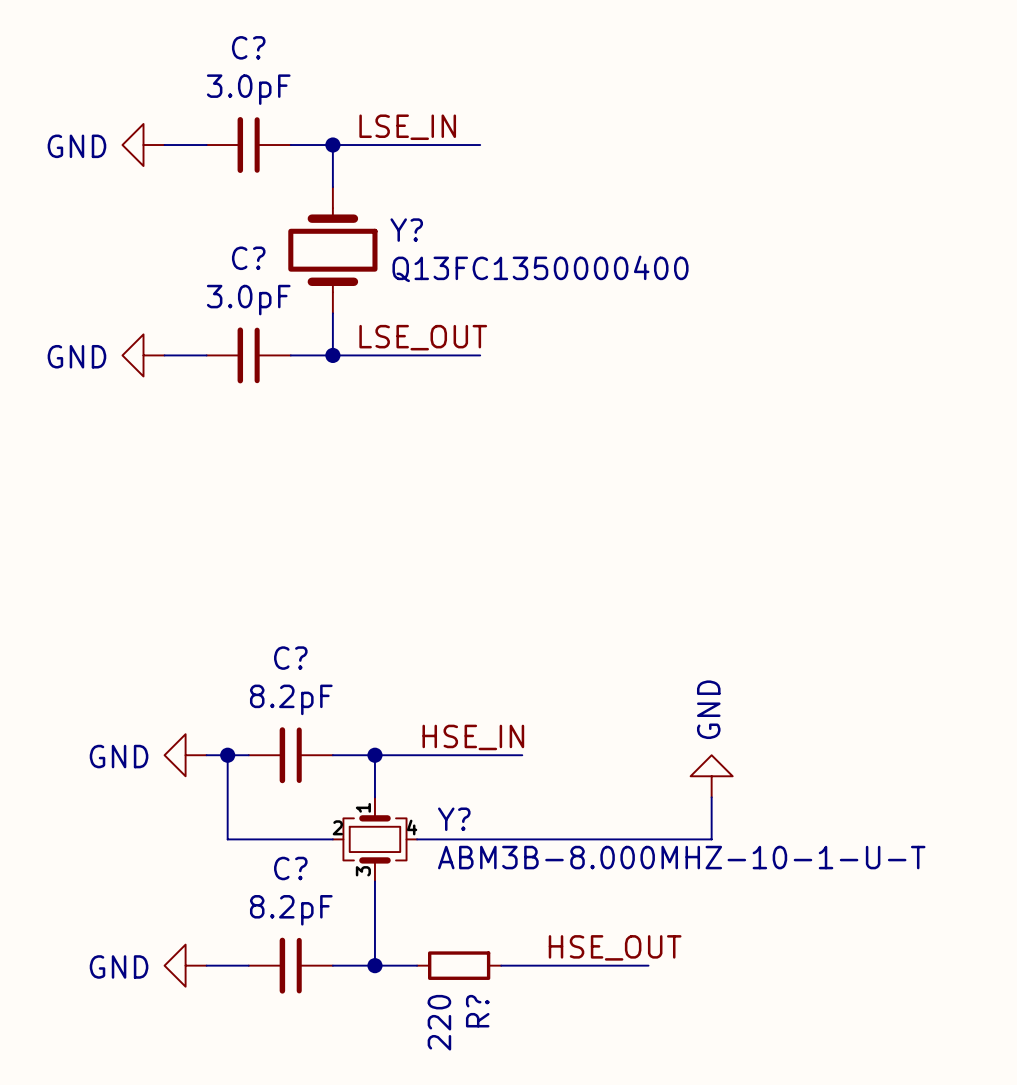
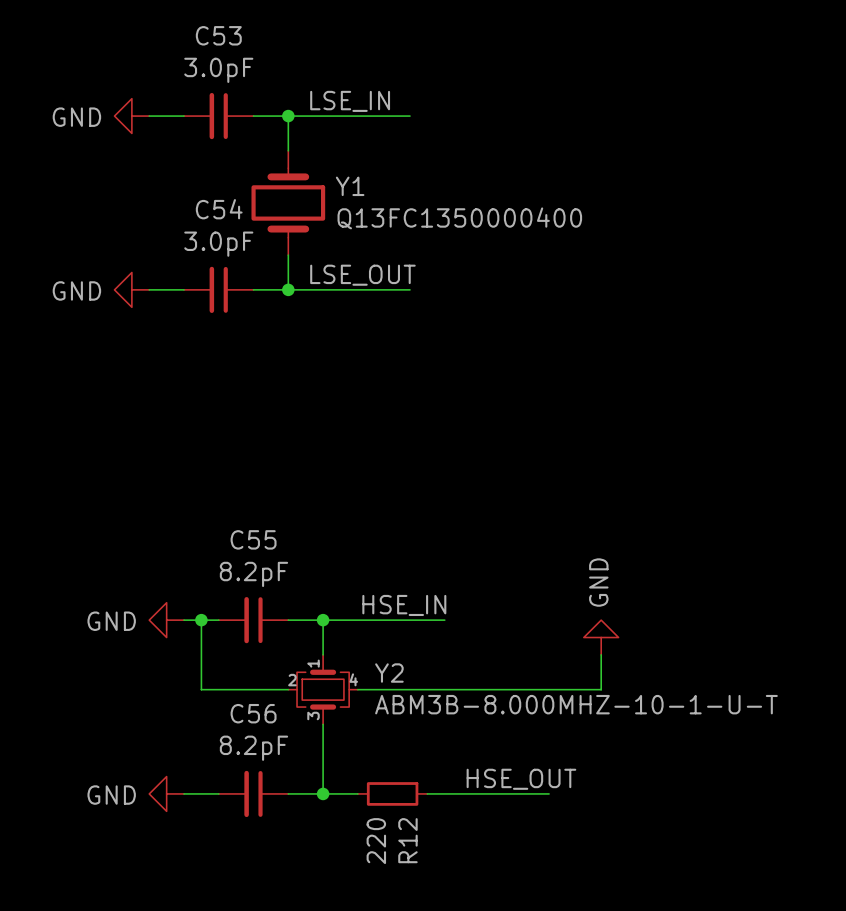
C? name: C? (248, 47) -> C53 (218, 35)
Y? name: Y? (406, 230) -> Y1 (350, 186)
C? name: C? (248, 258) -> C54 (219, 209)
C? name: C? (290, 658) -> C55 (253, 539)
Y? name: Y? (454, 819) -> Y2 (389, 673)
C? name: C? (290, 868) -> C56 (253, 713)
R? name: R? (477, 1011) -> R12 (407, 840)

